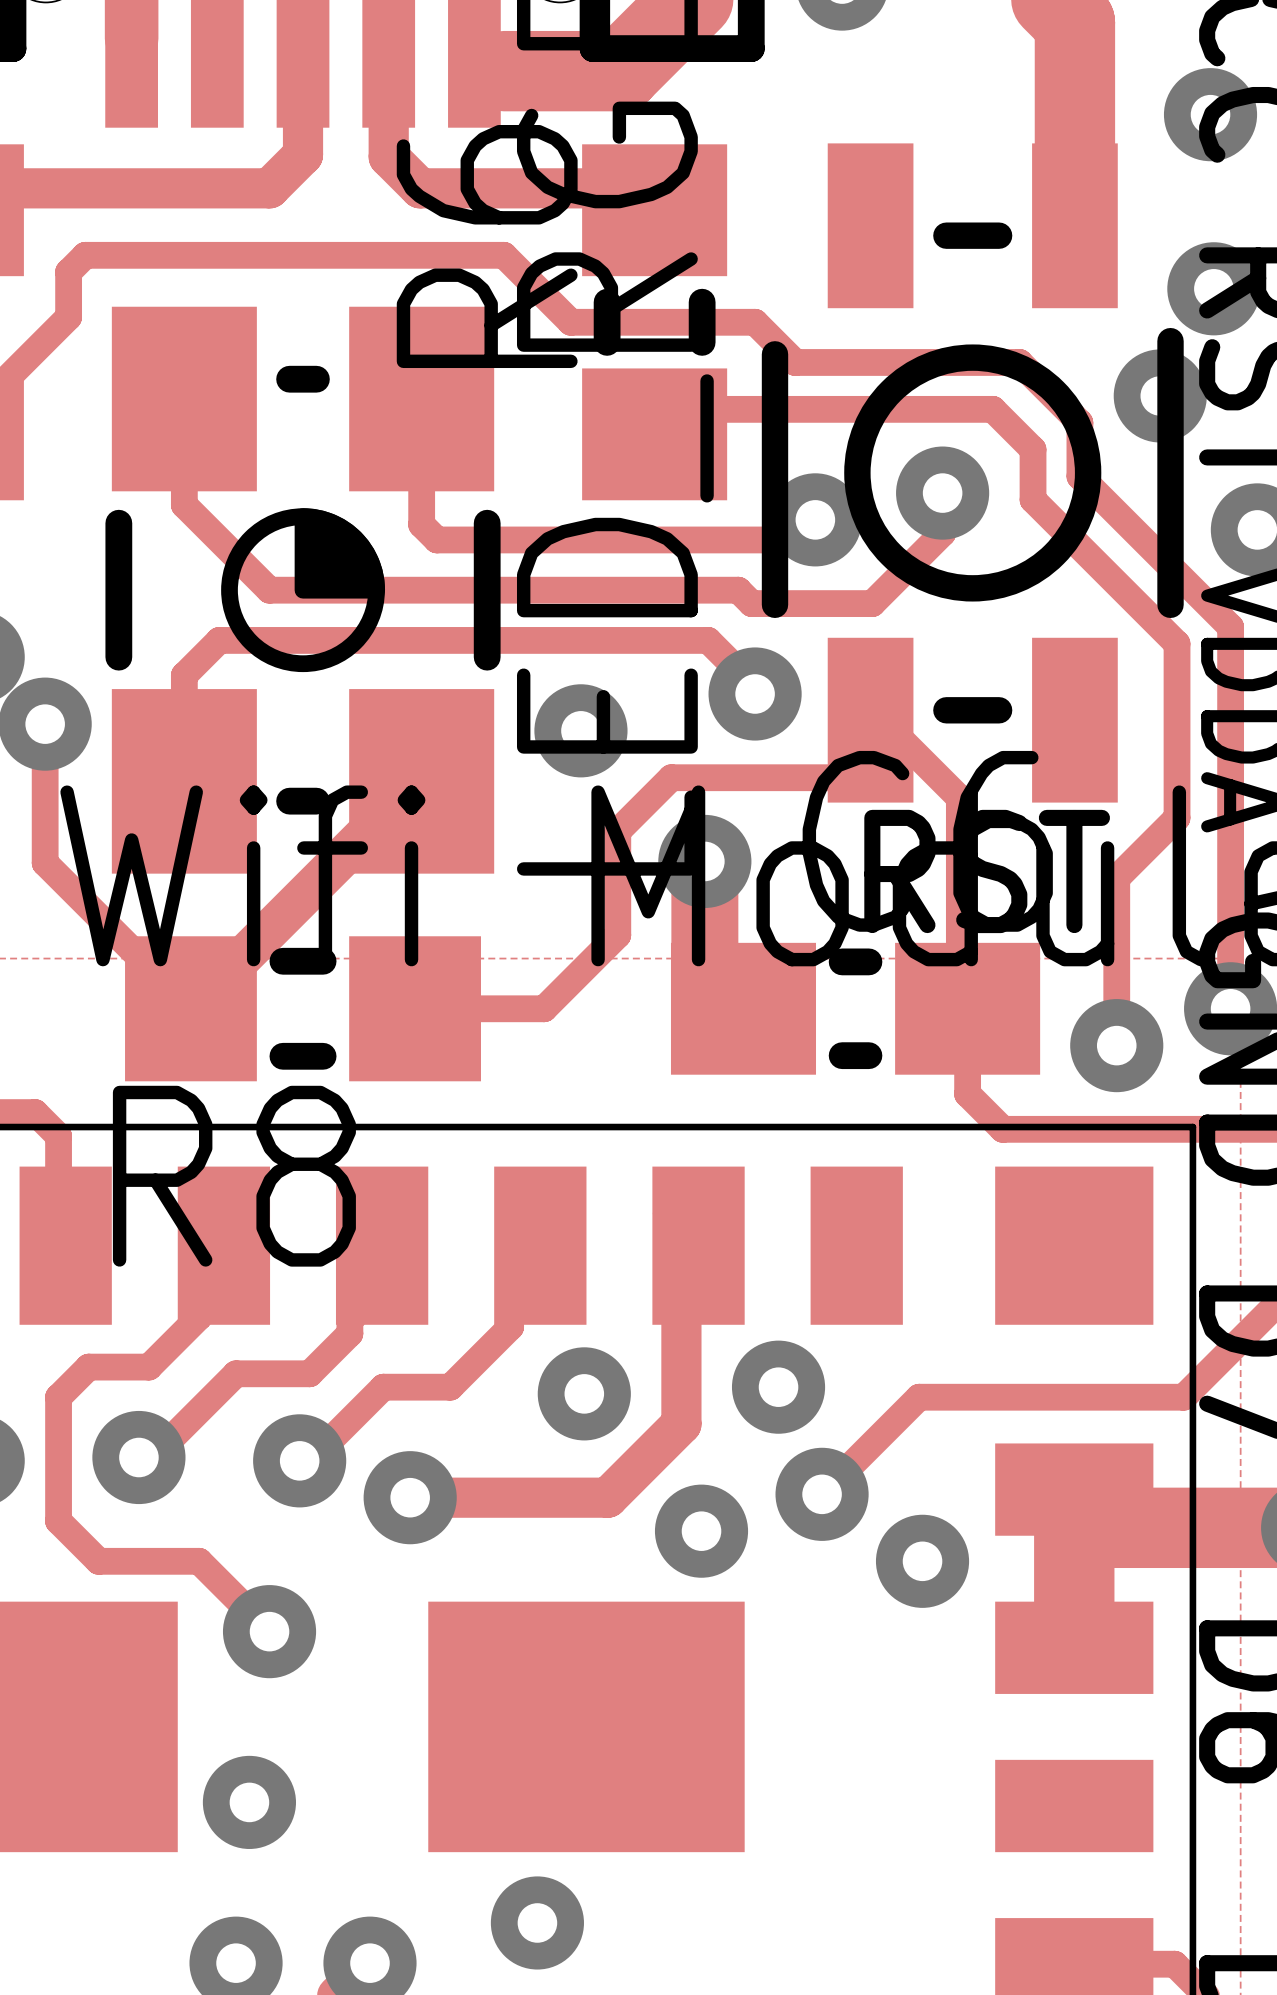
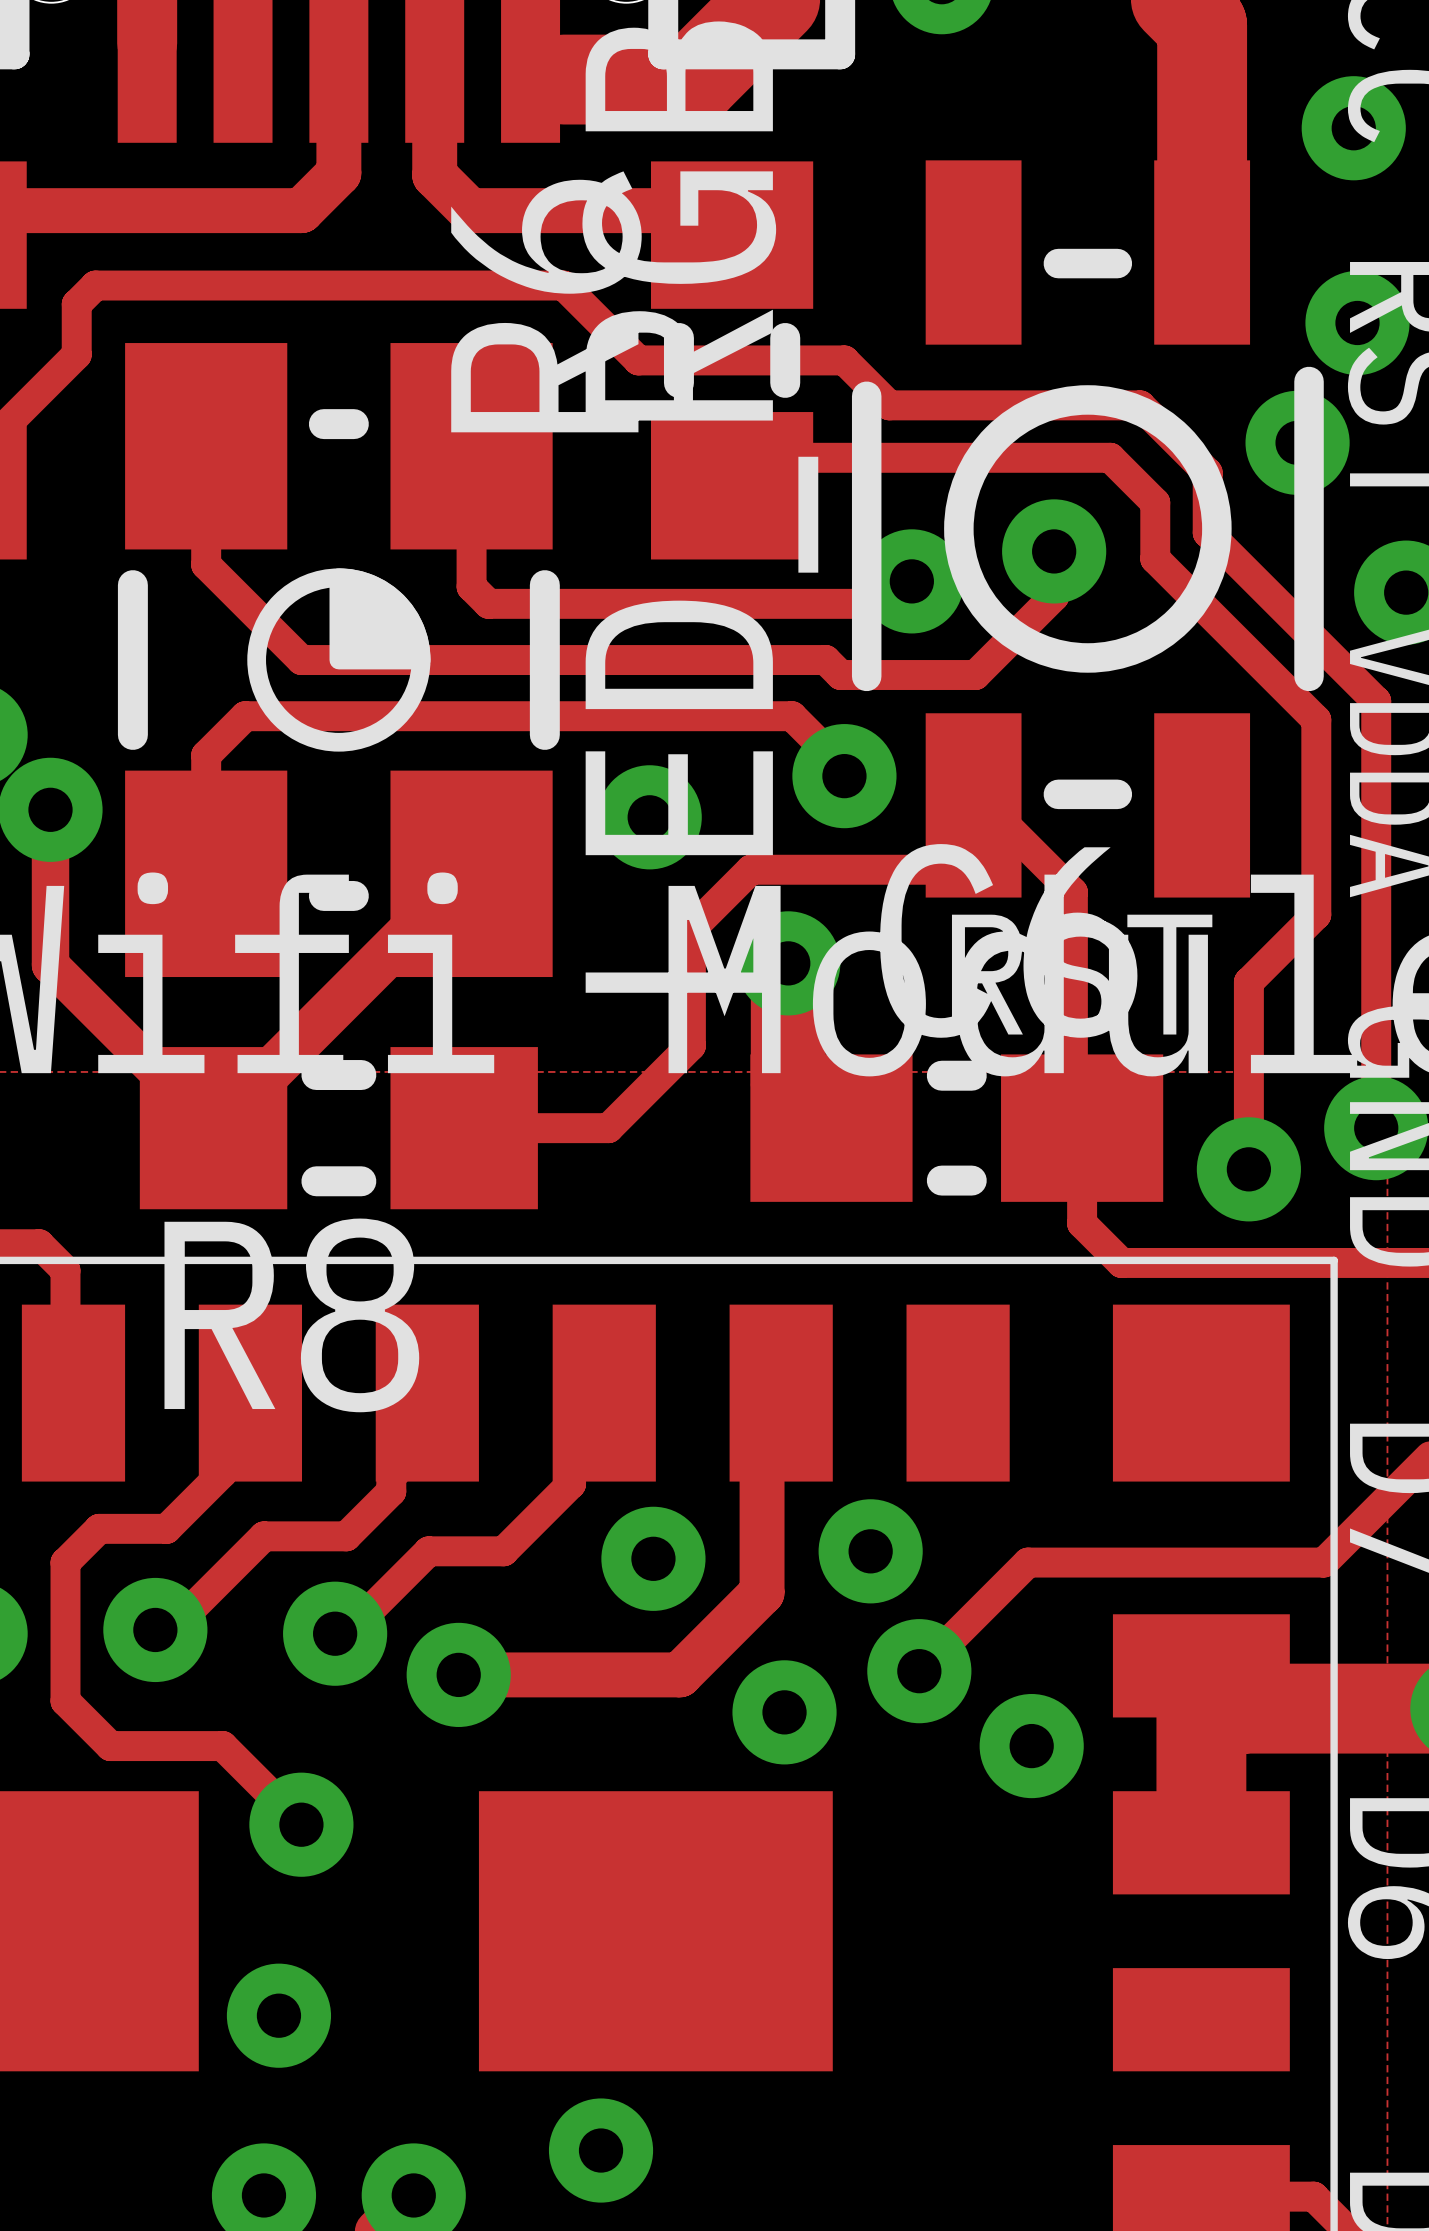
track width: thin (45, 724) (45, 862) (190, 1008) -> thick (50, 809) (50, 965) (213, 1128)

